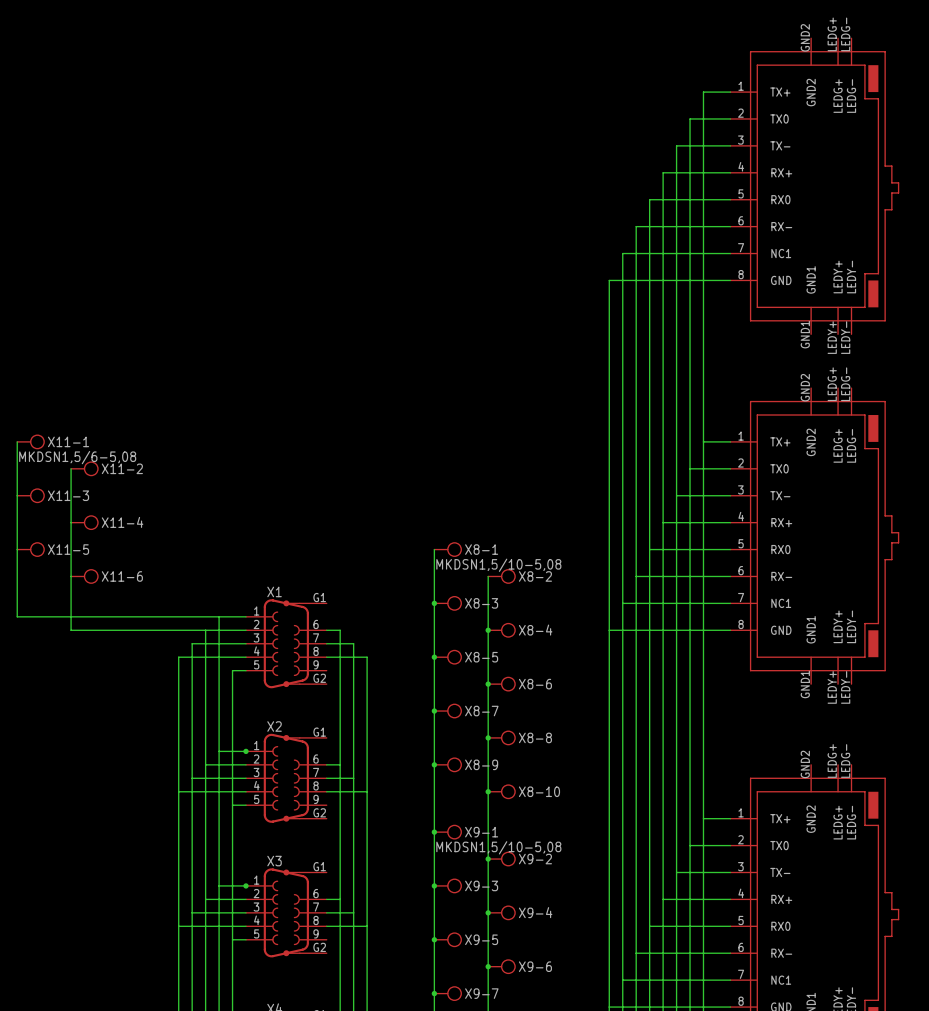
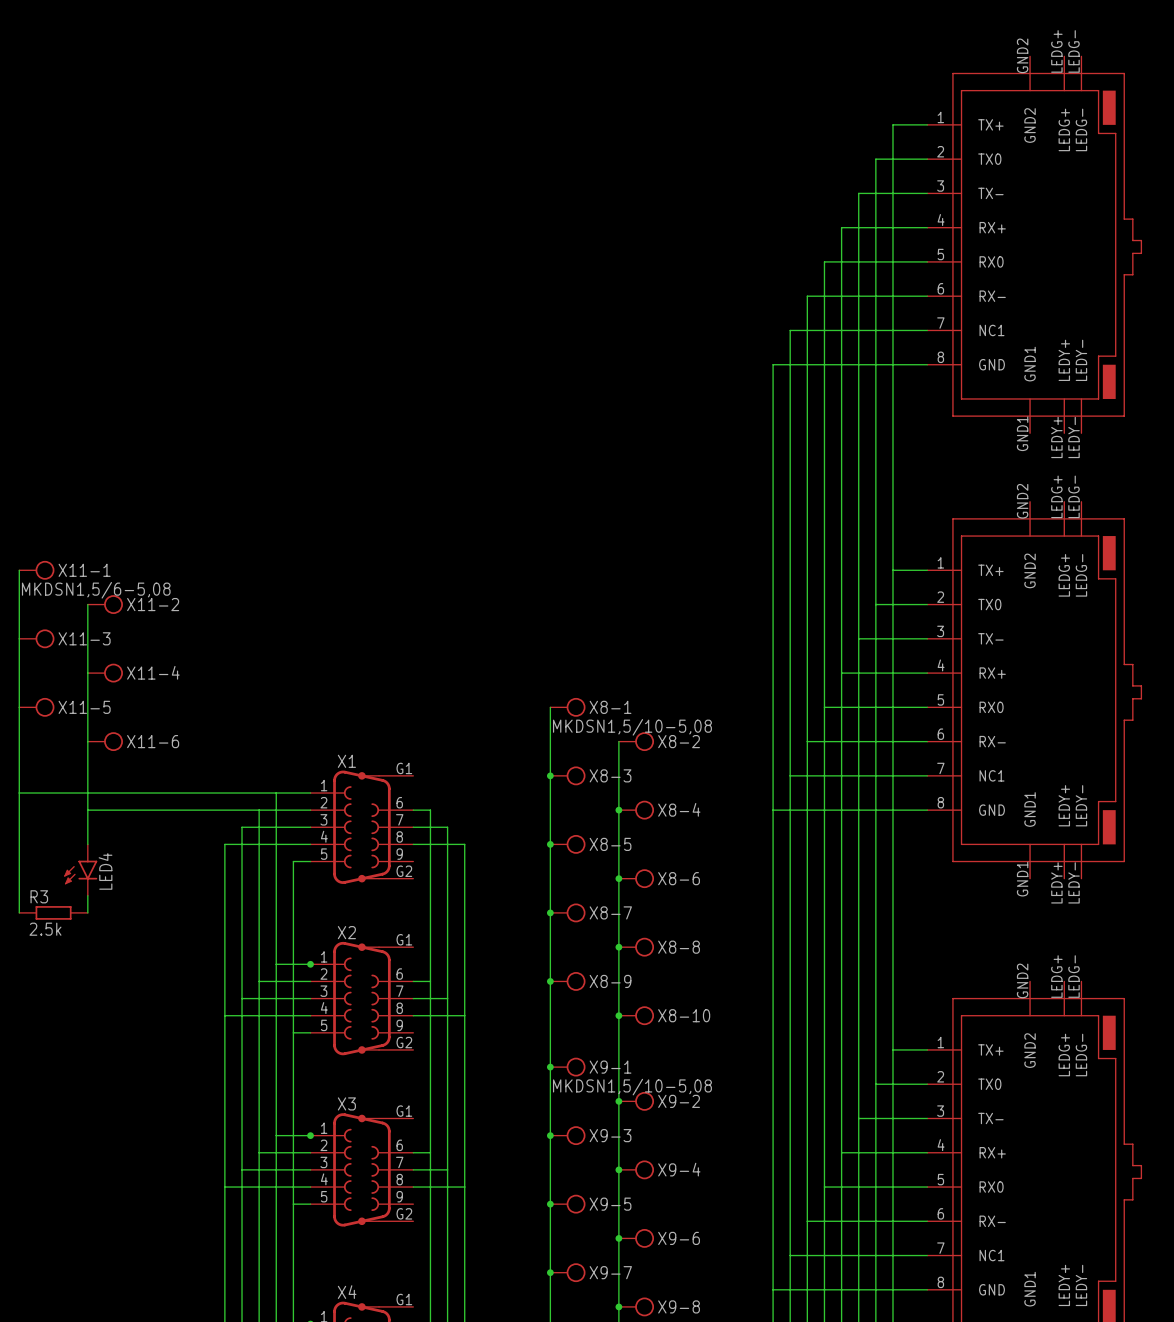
wire: none -> (19, 793) (19, 912)
wire: none -> (87, 810) (87, 844)
LED4: none -> (80, 870)
wire: none -> (87, 895) (87, 912)
R3: none -> 2.5k (53, 912)

